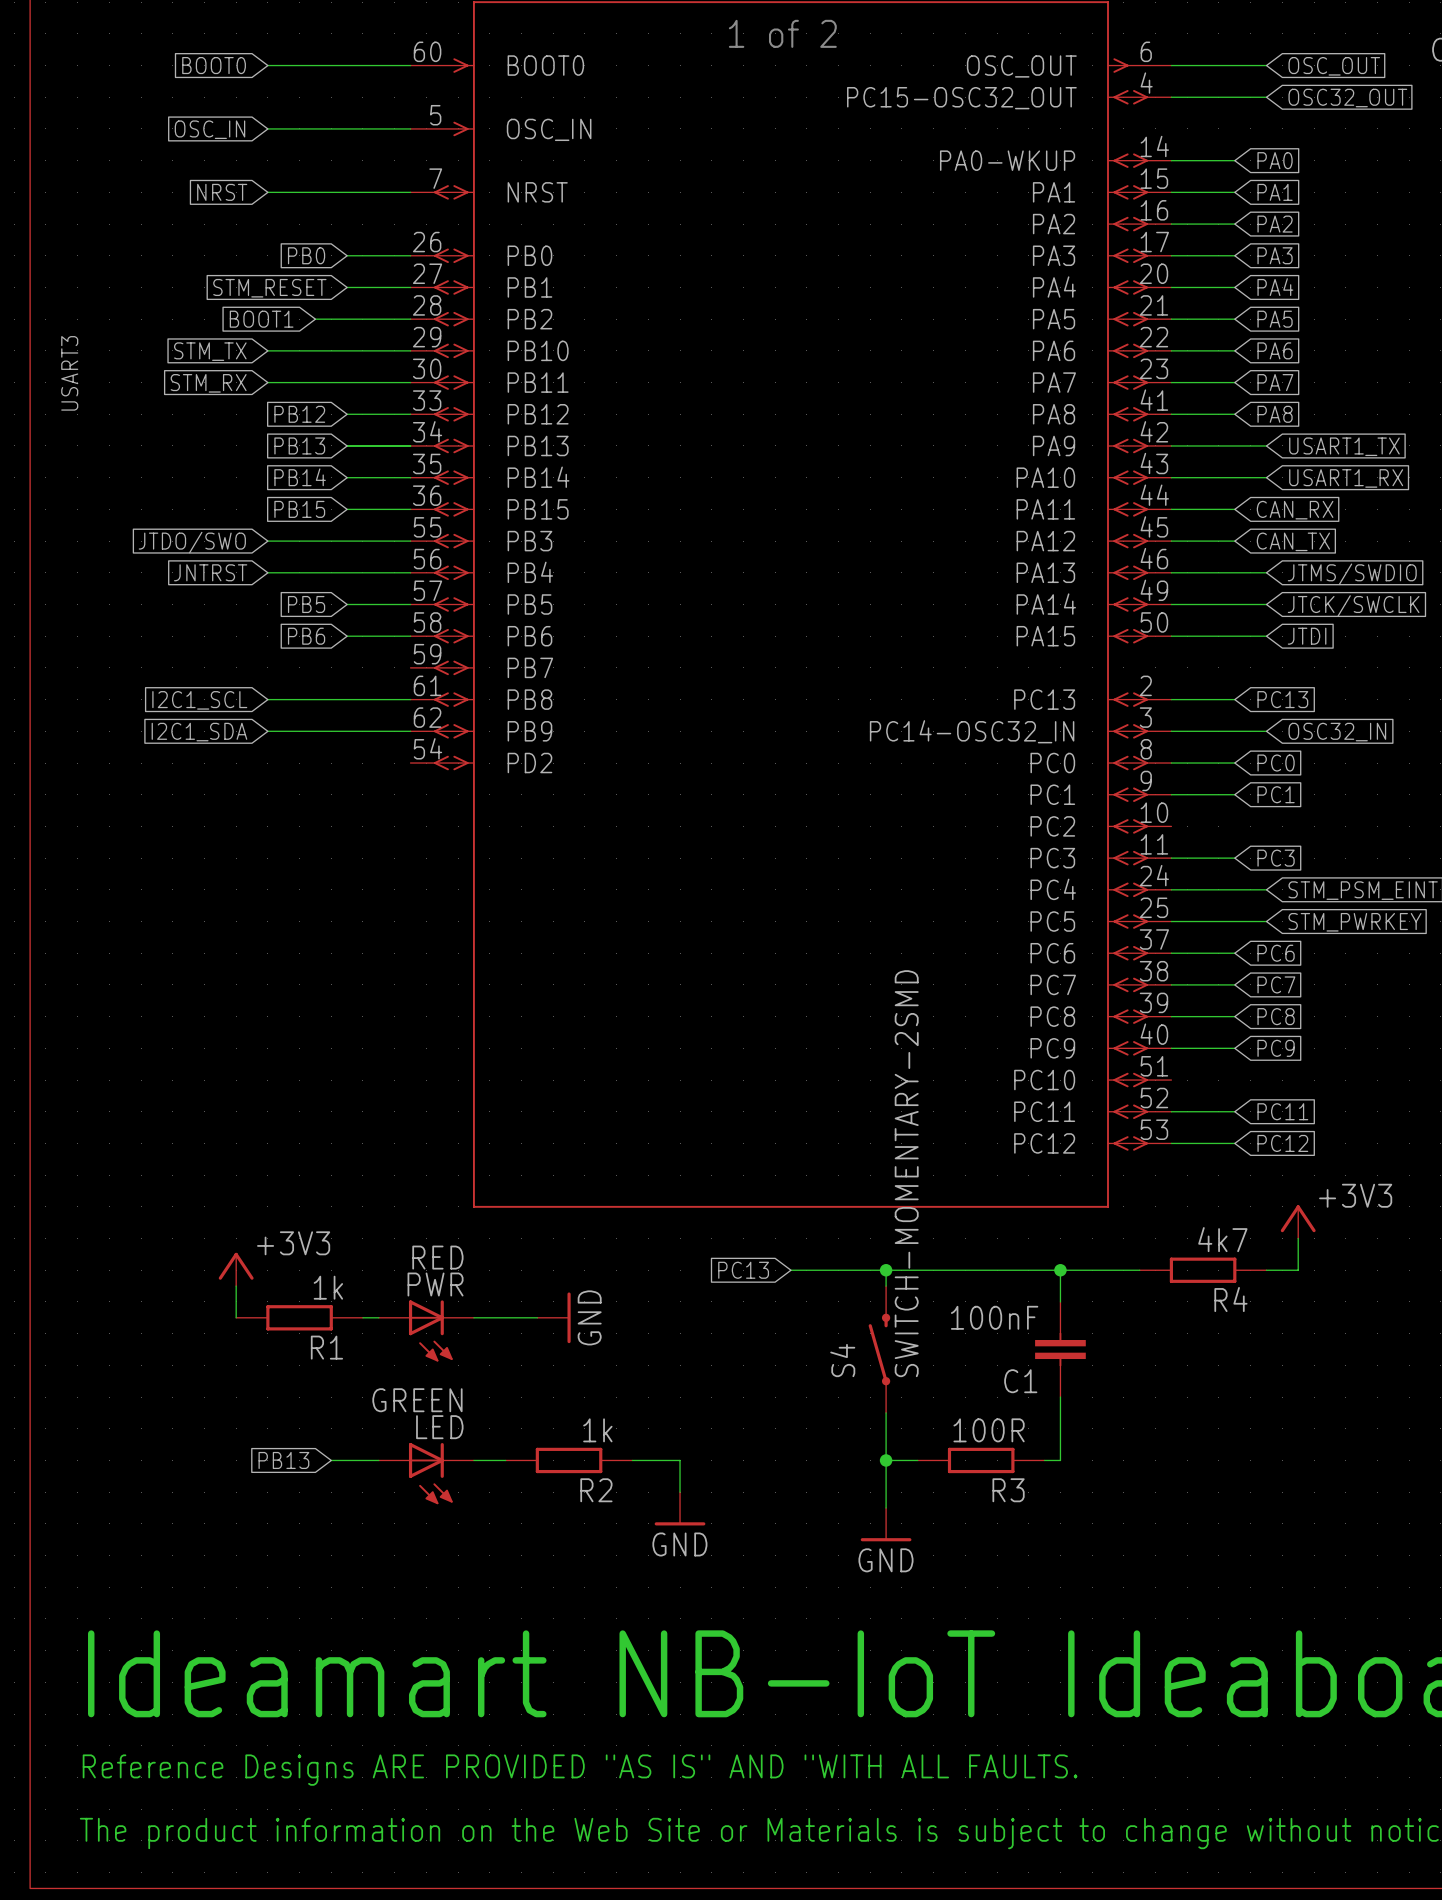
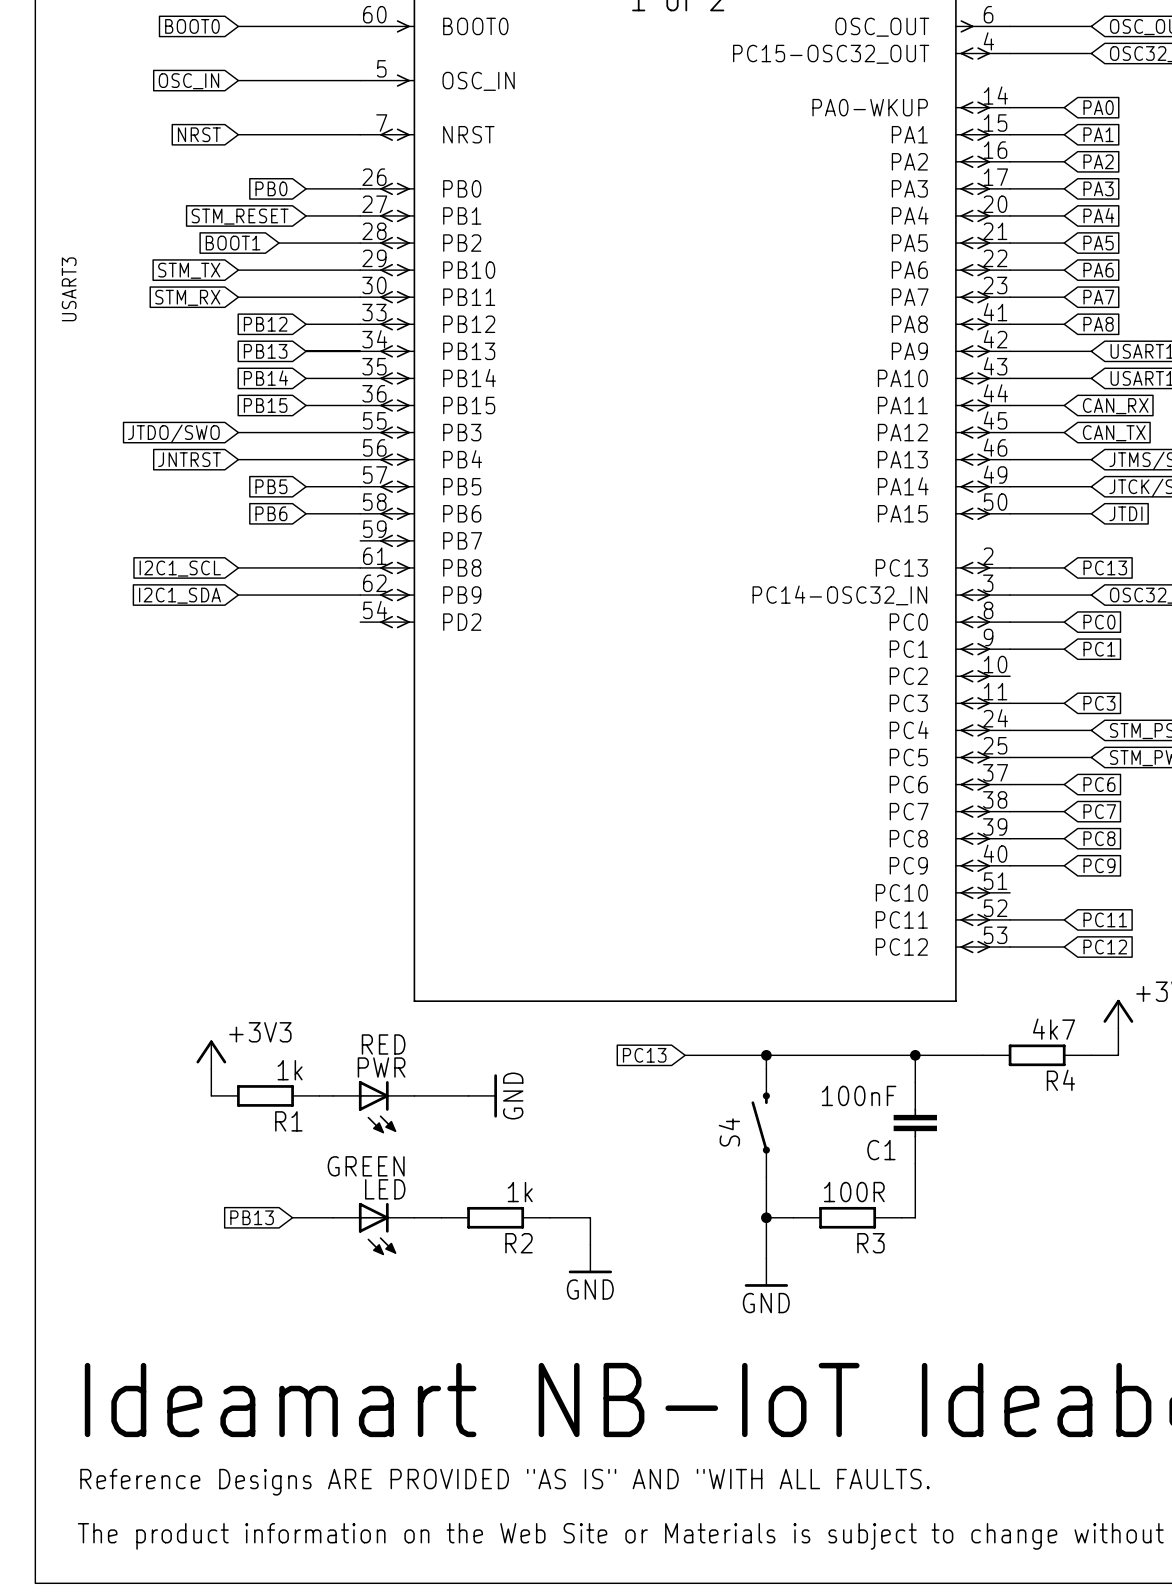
S4 value: SWITCH-MOMENTARY-2SMD (906, 1173) -> none

